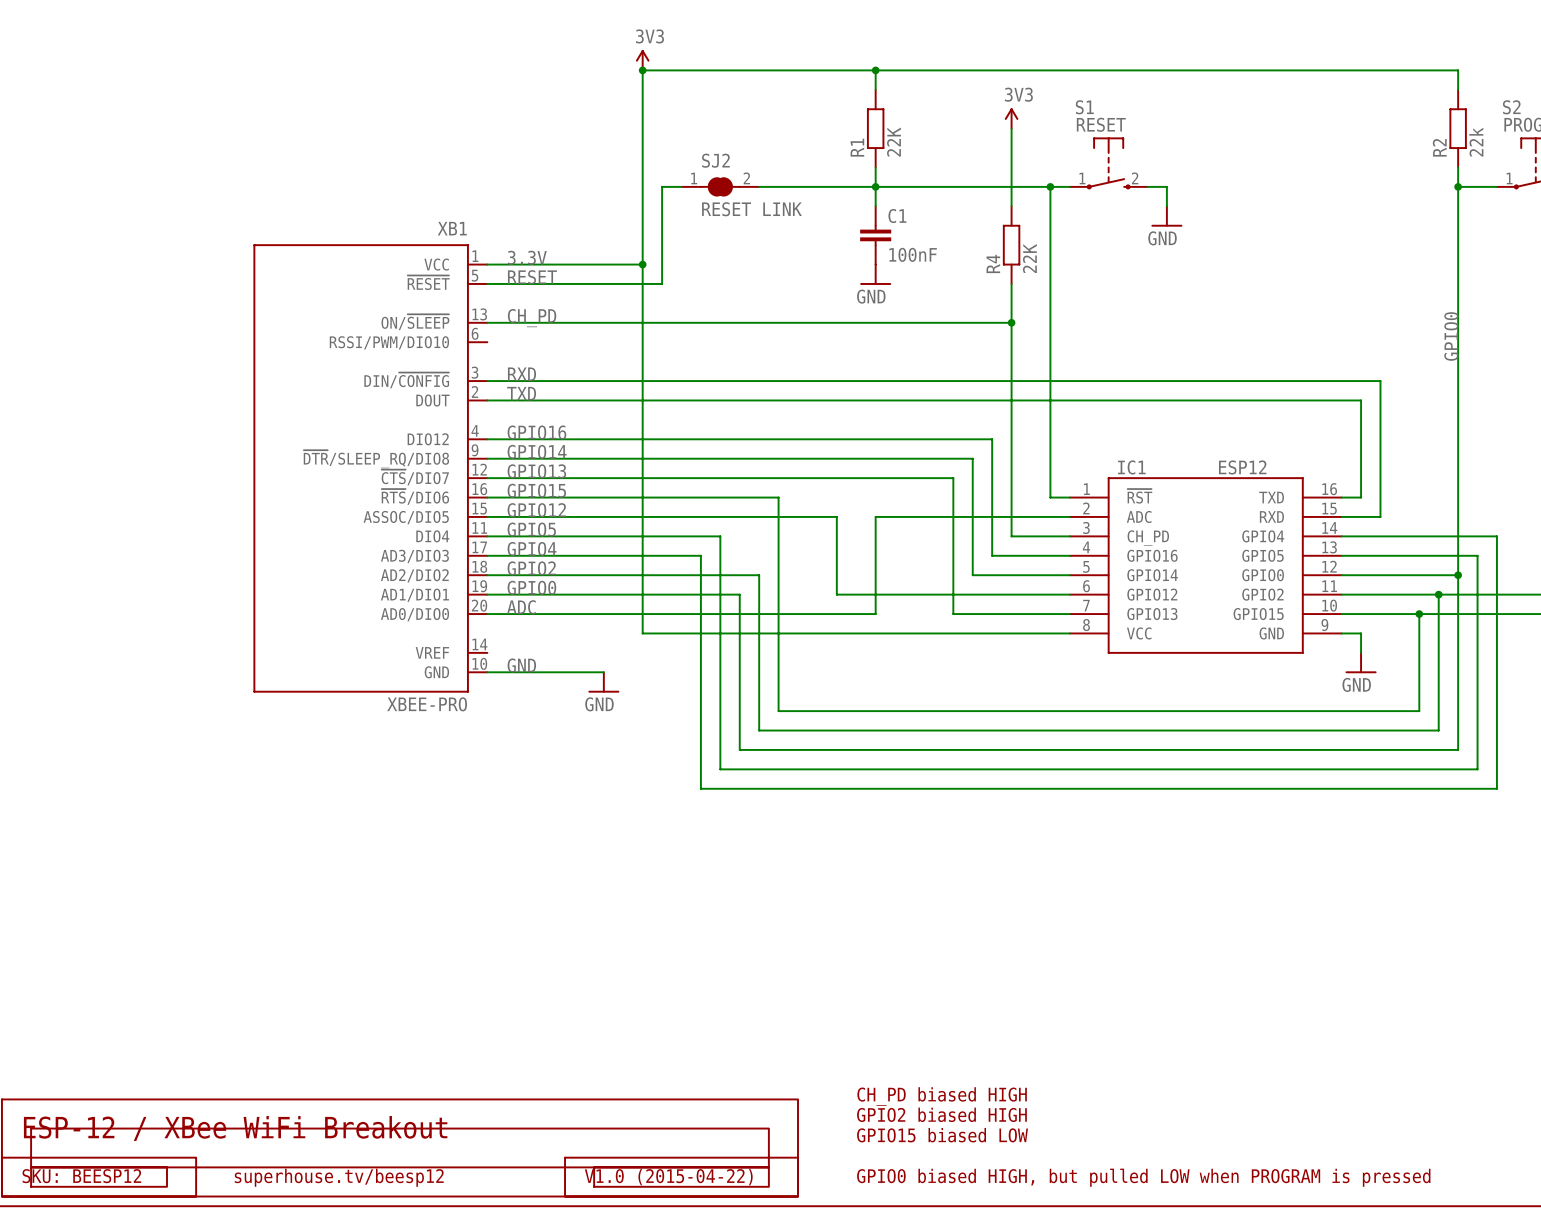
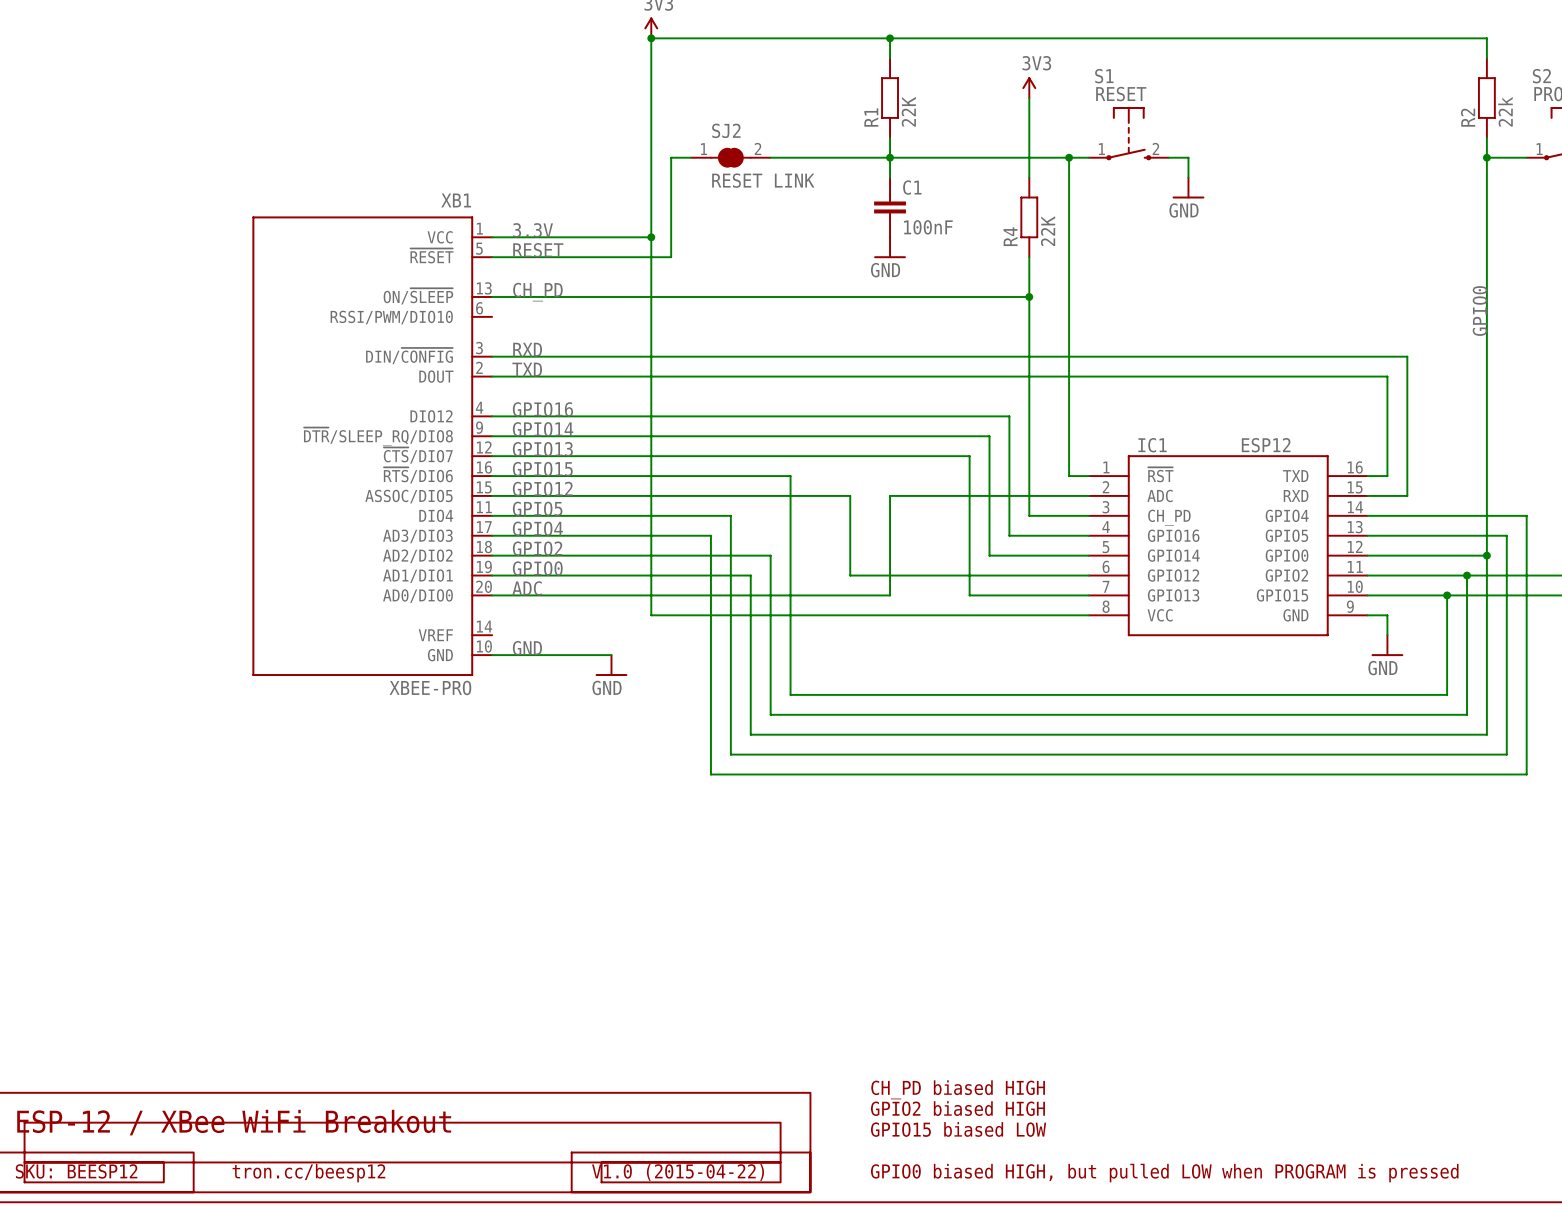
text: superhouse.tv/beesp12 (339, 1177) -> tron.cc/beesp12 (308, 1173)

